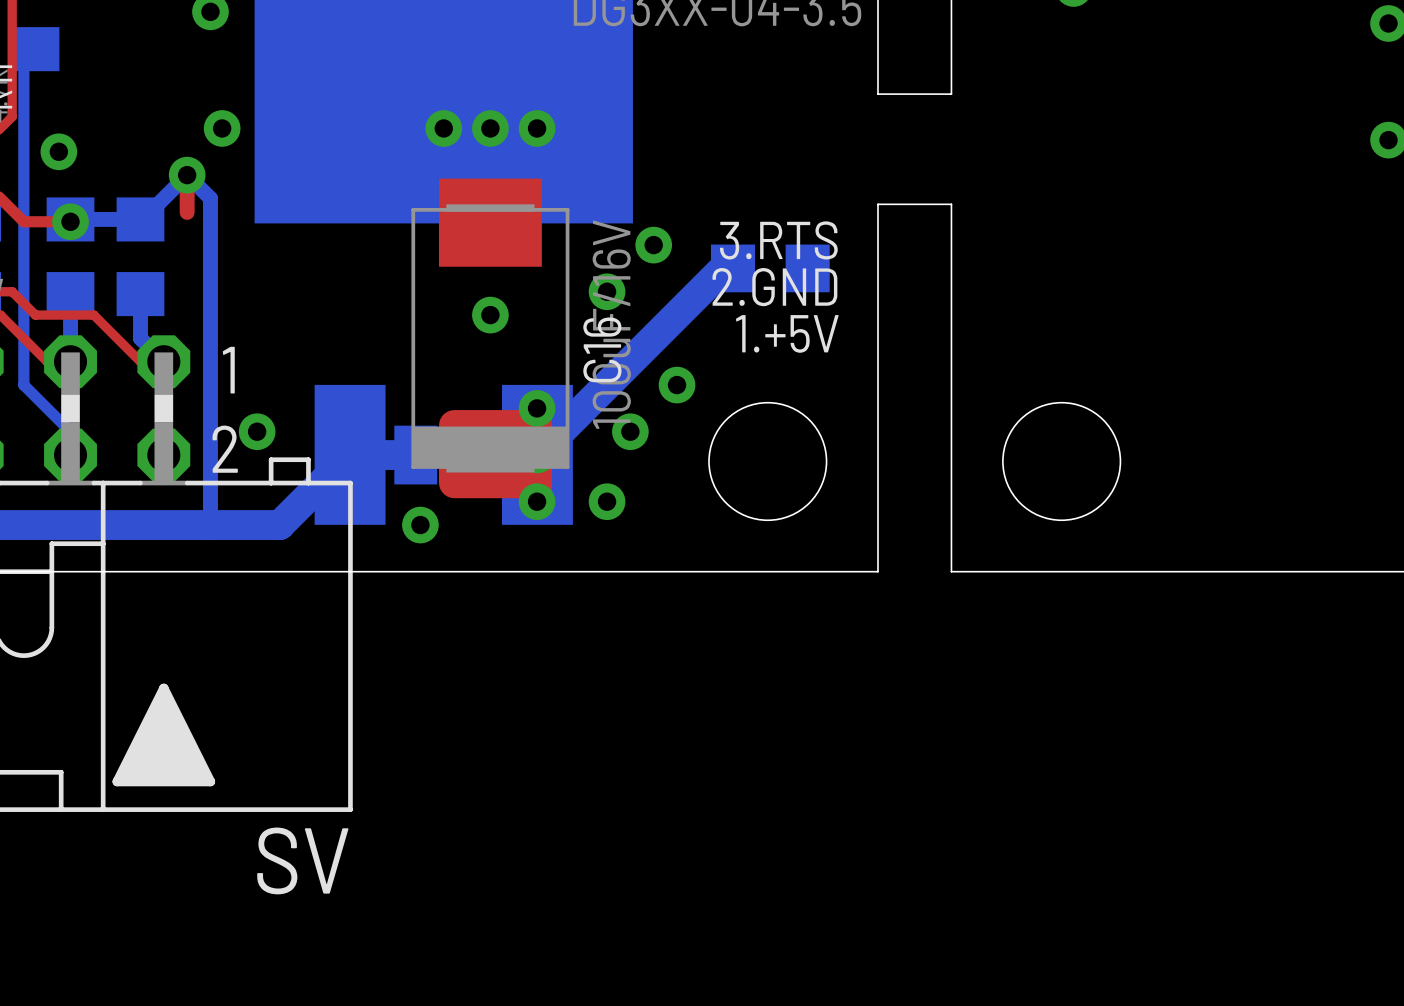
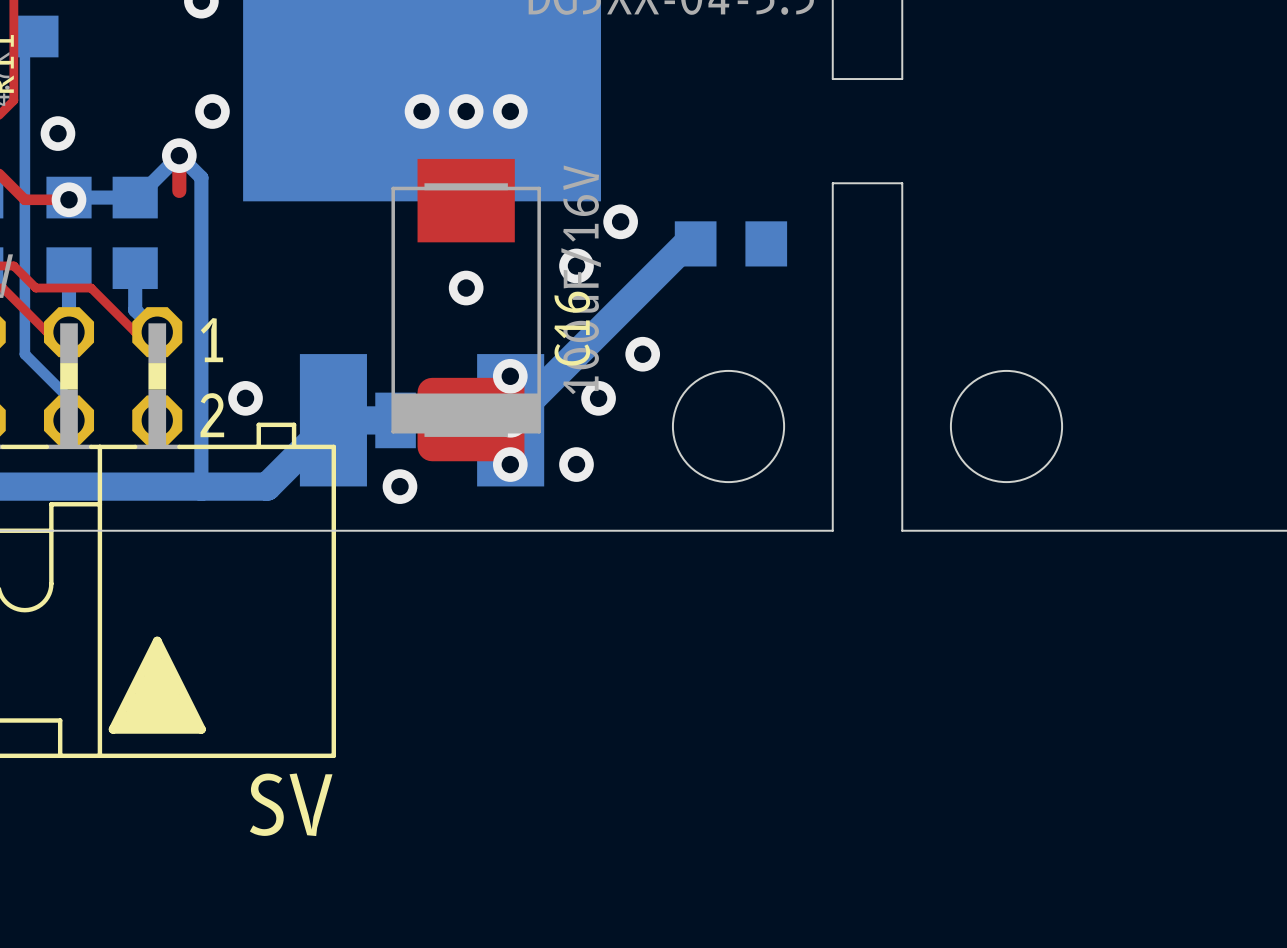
text: 3.RTS (778, 240) -> none
text: 2.GND (774, 287) -> none
text: 1.+5V (787, 333) -> none

